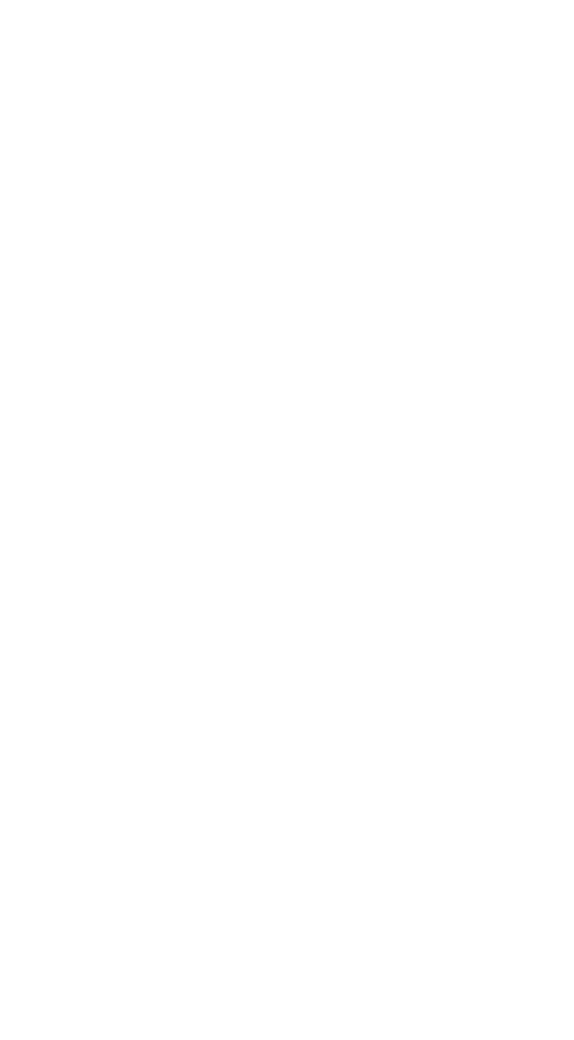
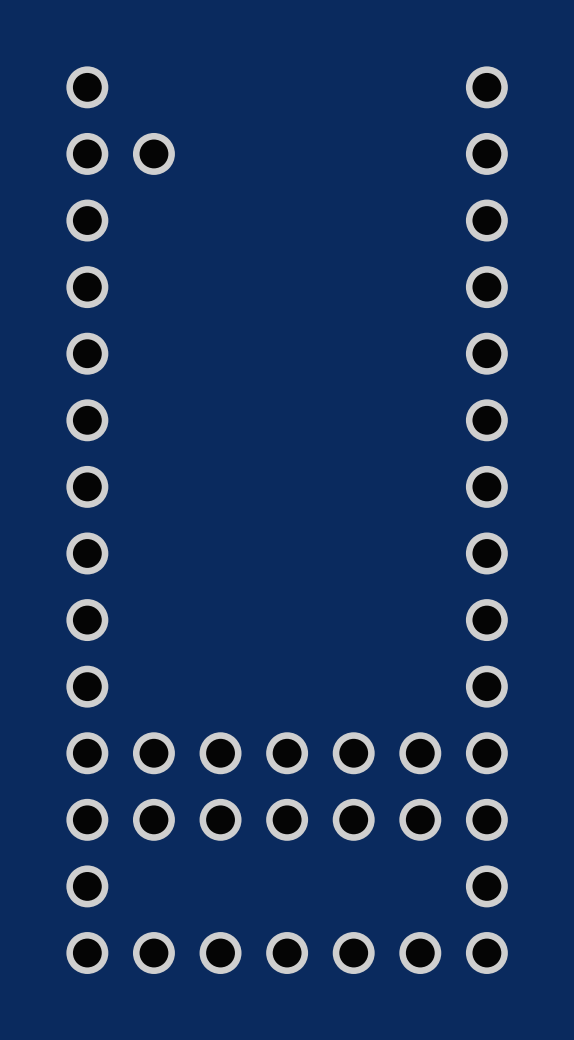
part: none -> (287, 520)

